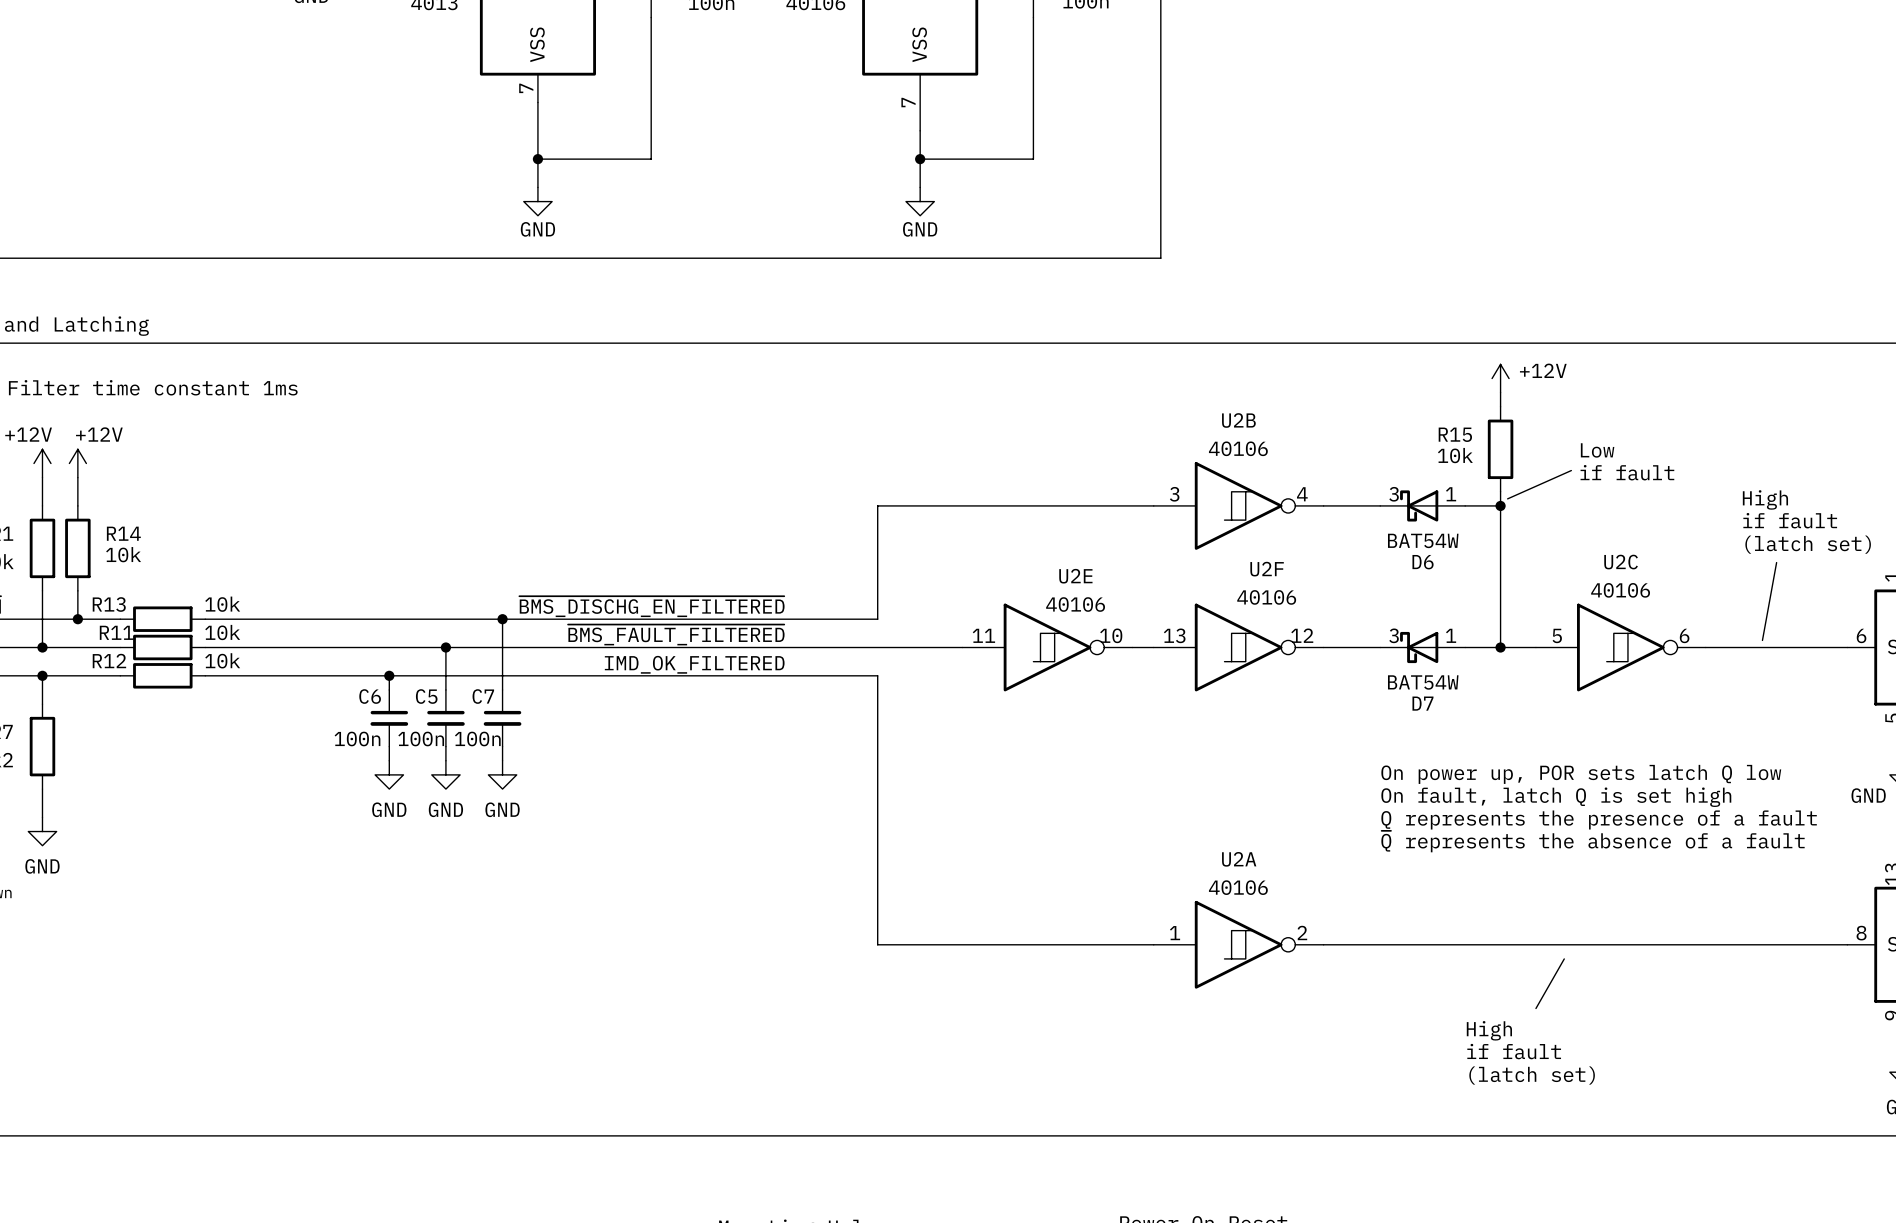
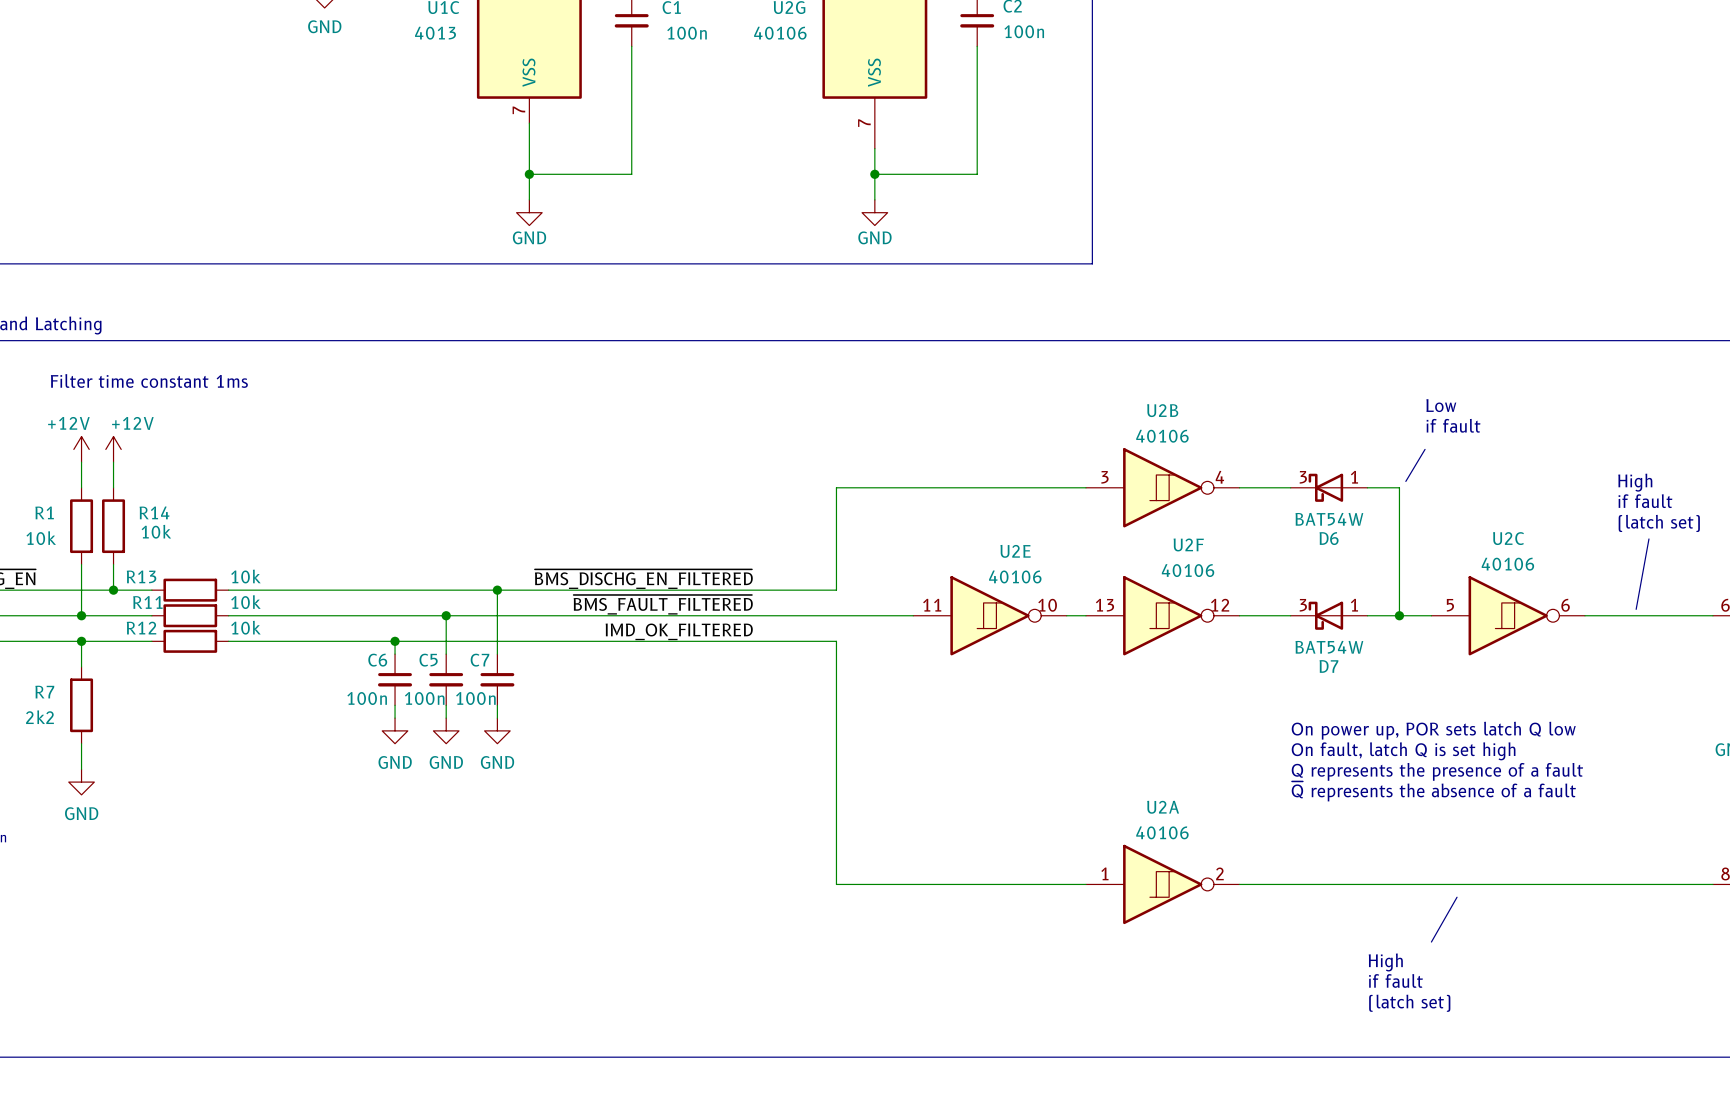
power symbol: +12V (1500, 378) -> none
wire: (1500, 392) (1500, 406) -> none
R15: 10k (1500, 449) -> none
text position: Low (1597, 450) -> Low (1441, 405)
line: (1571, 470) (1507, 498) -> (1425, 449) (1405, 481)
text position: if fault (1627, 472) -> if fault (1453, 425)
wire: (1500, 491) (1500, 505) -> none
junction: (1500, 505) -> none

